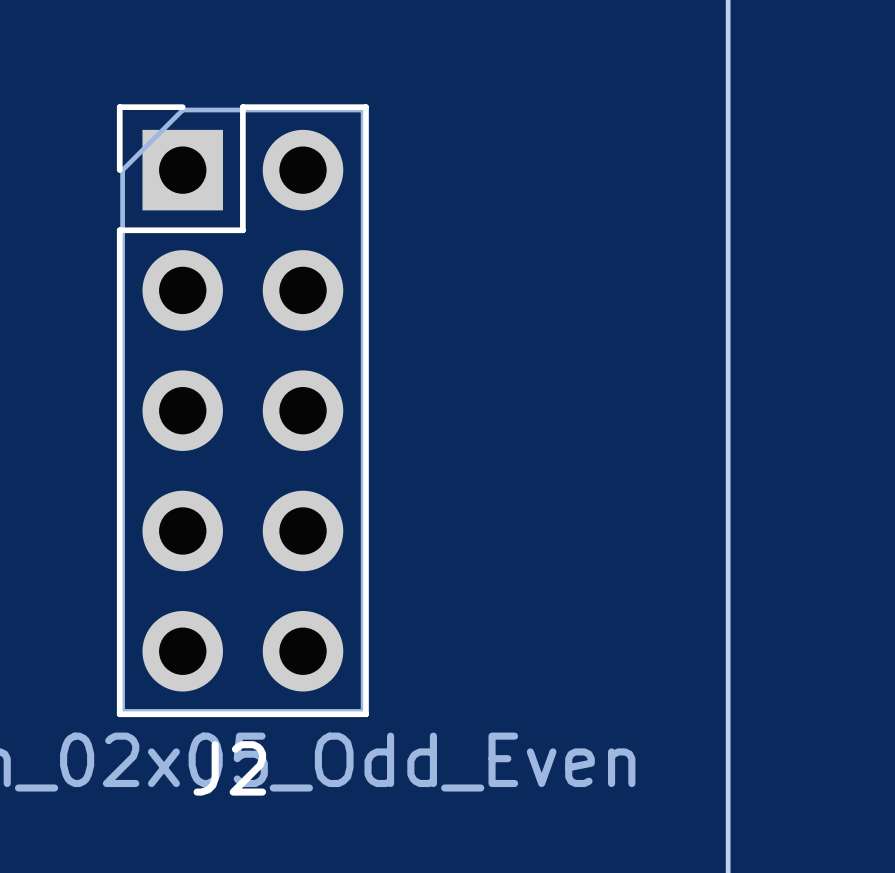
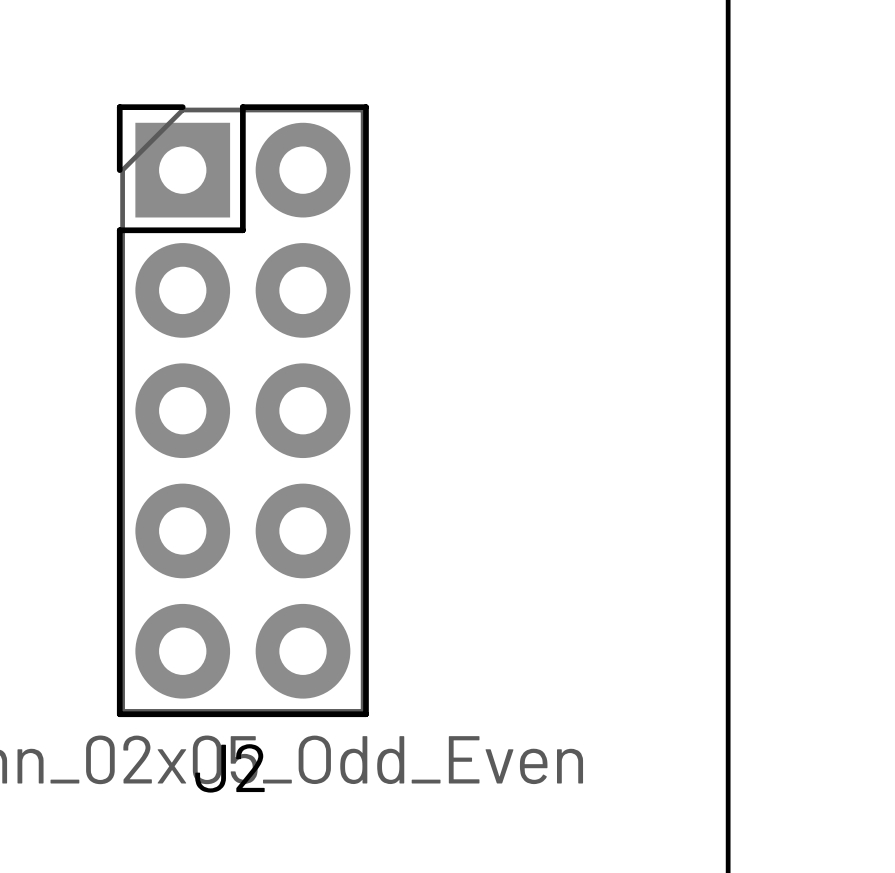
J2 footprint: [116, 104, 369, 718] -> [116, 104, 369, 718]

